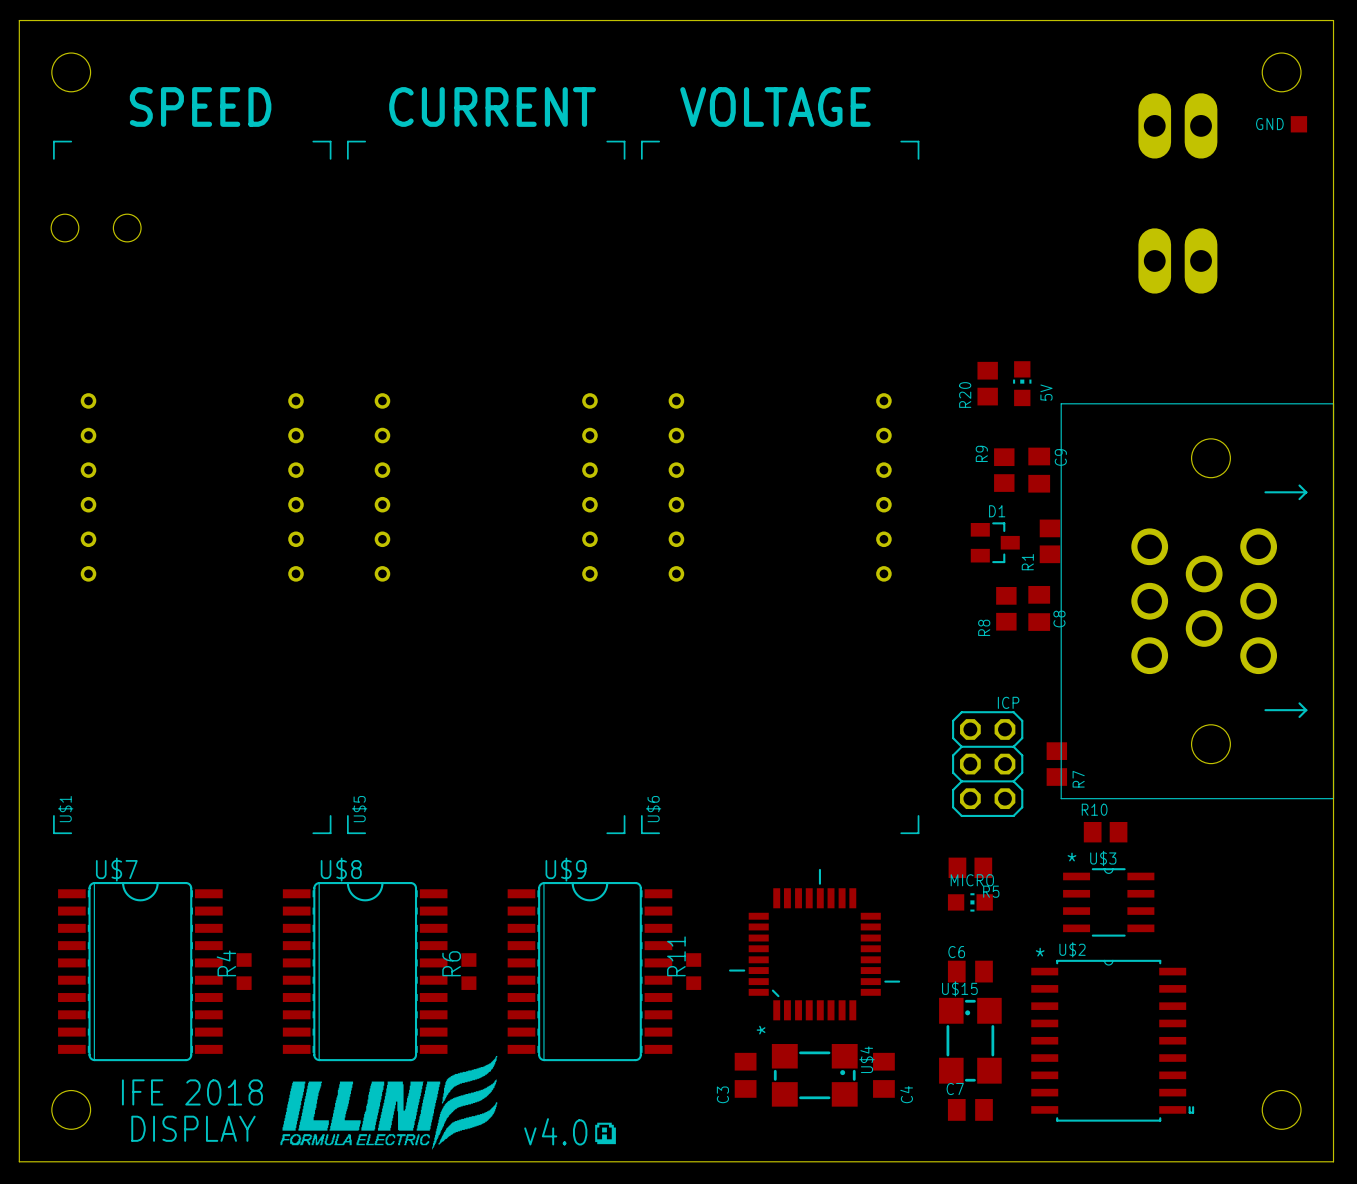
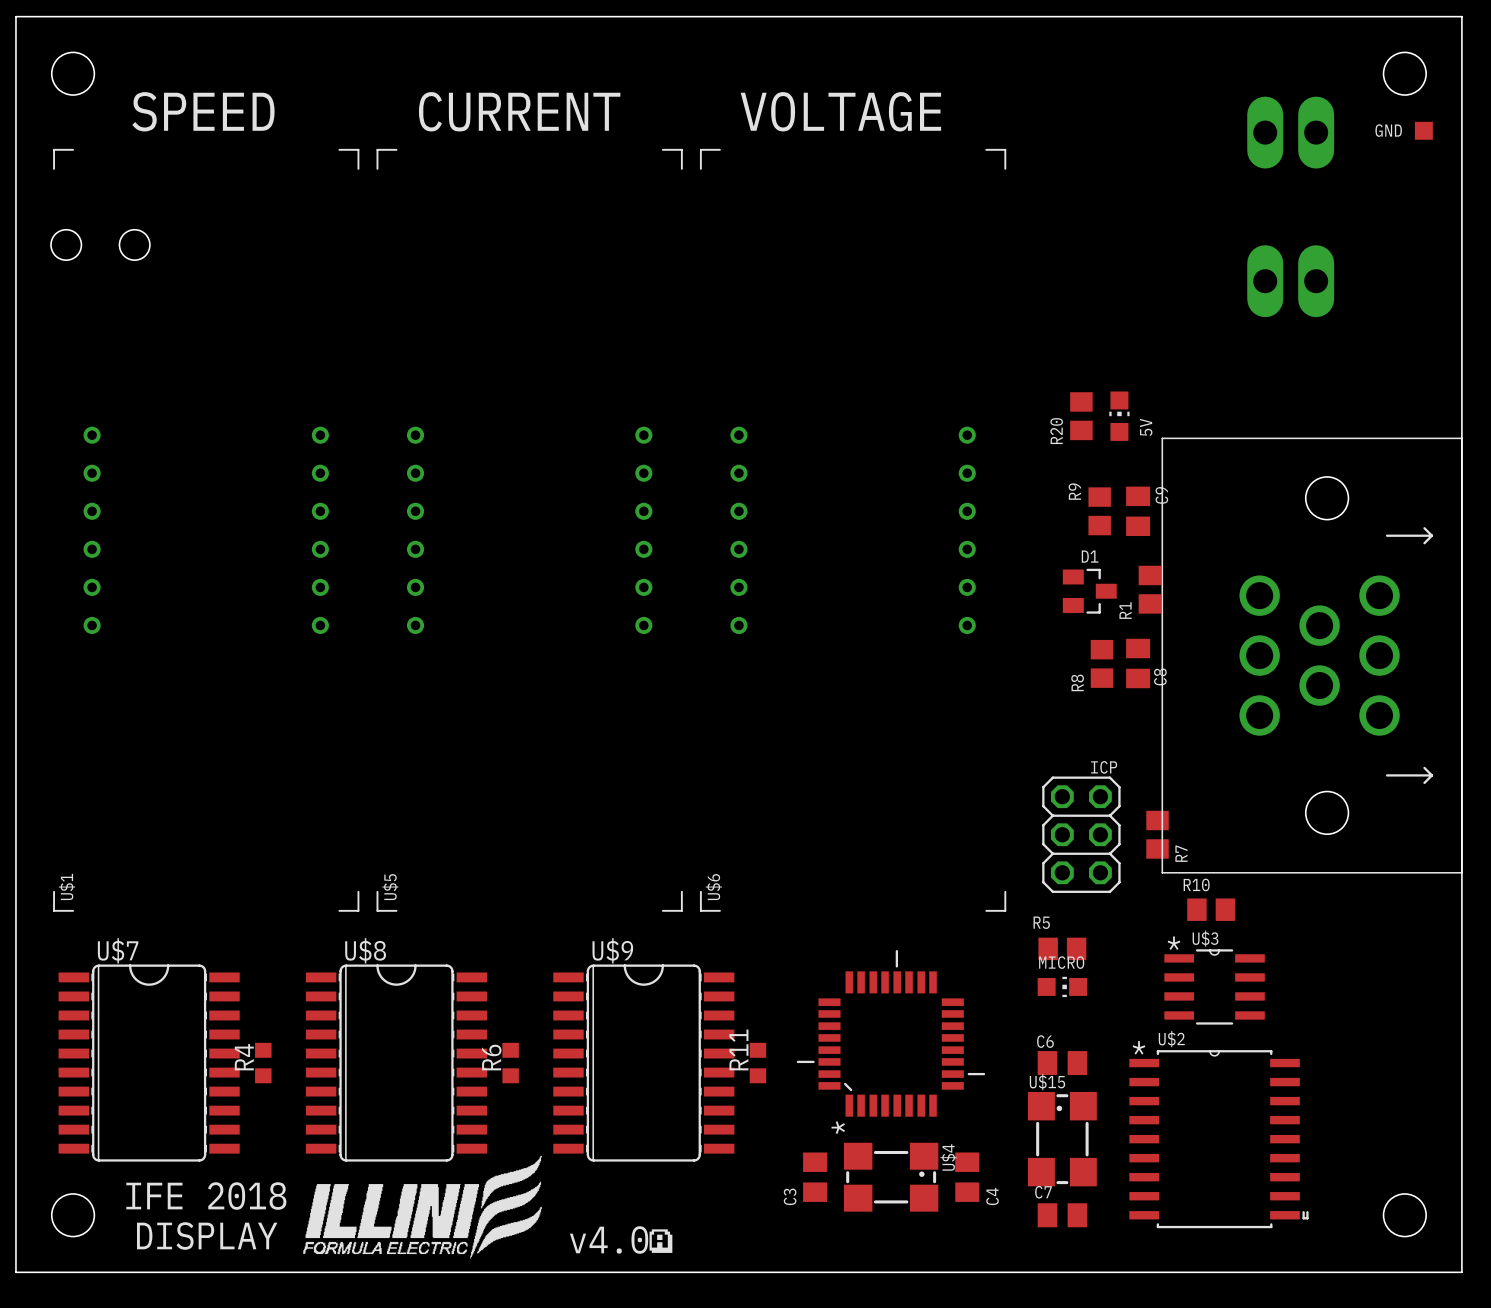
R5 name position: R5 (991, 891) -> R5 (1041, 922)

